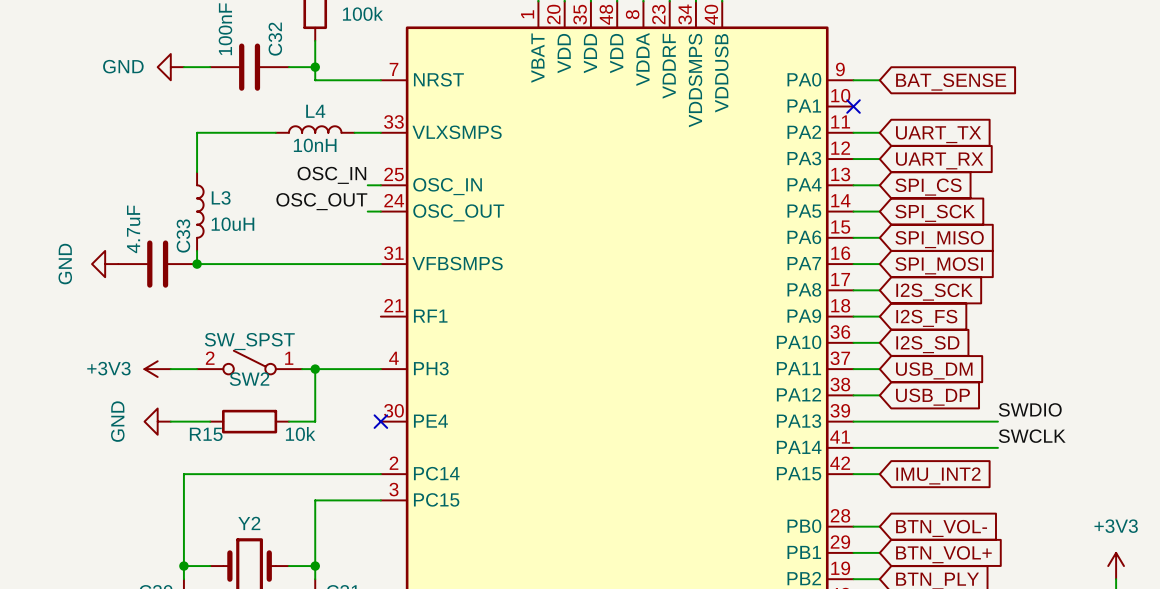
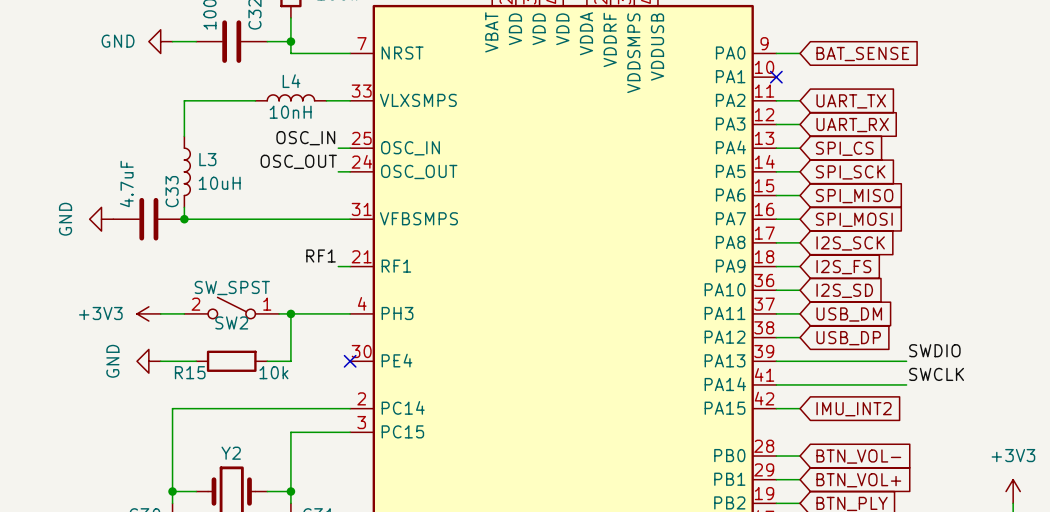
label: none -> RF1 (321, 256)
wire: none -> (338, 266) (350, 266)

